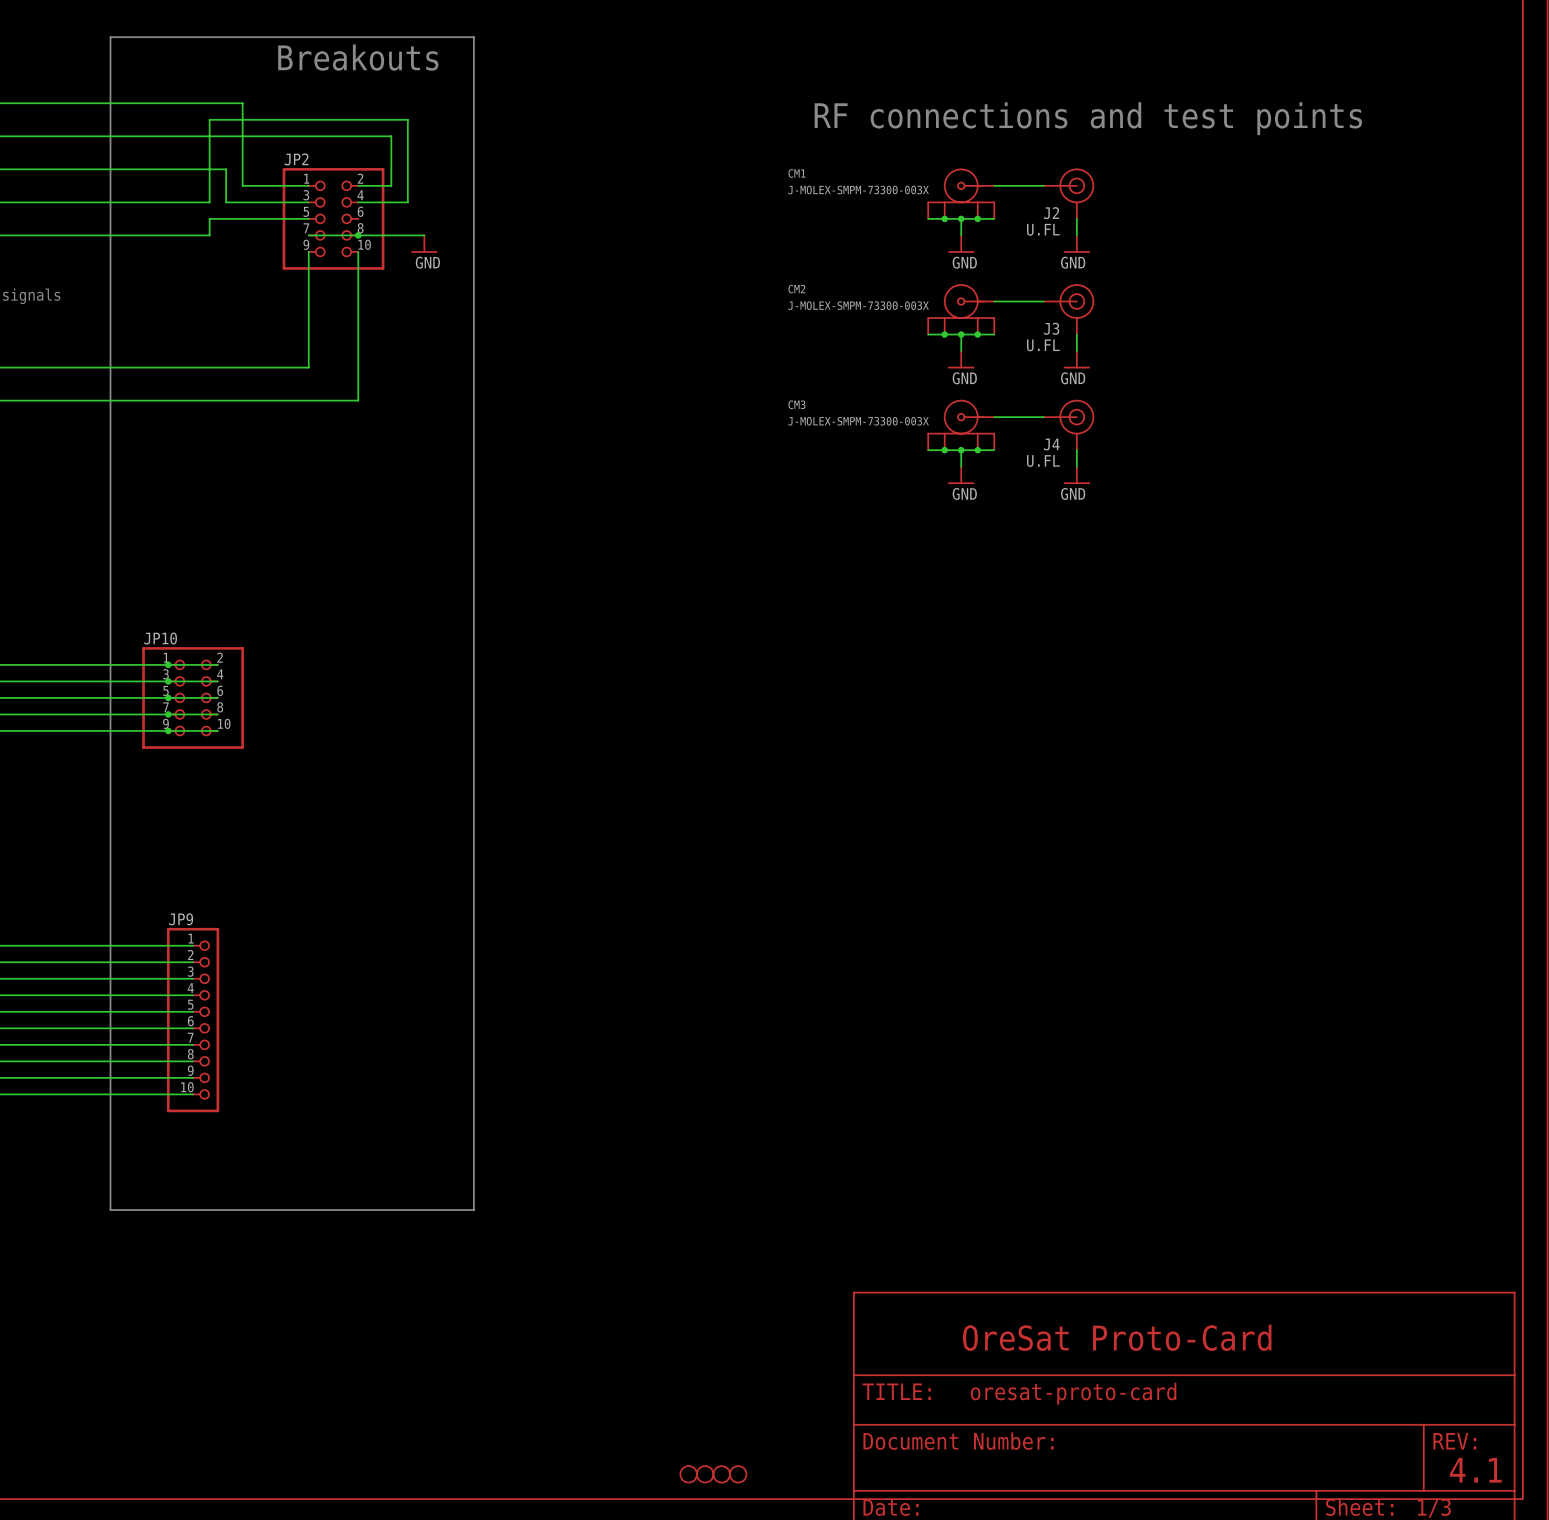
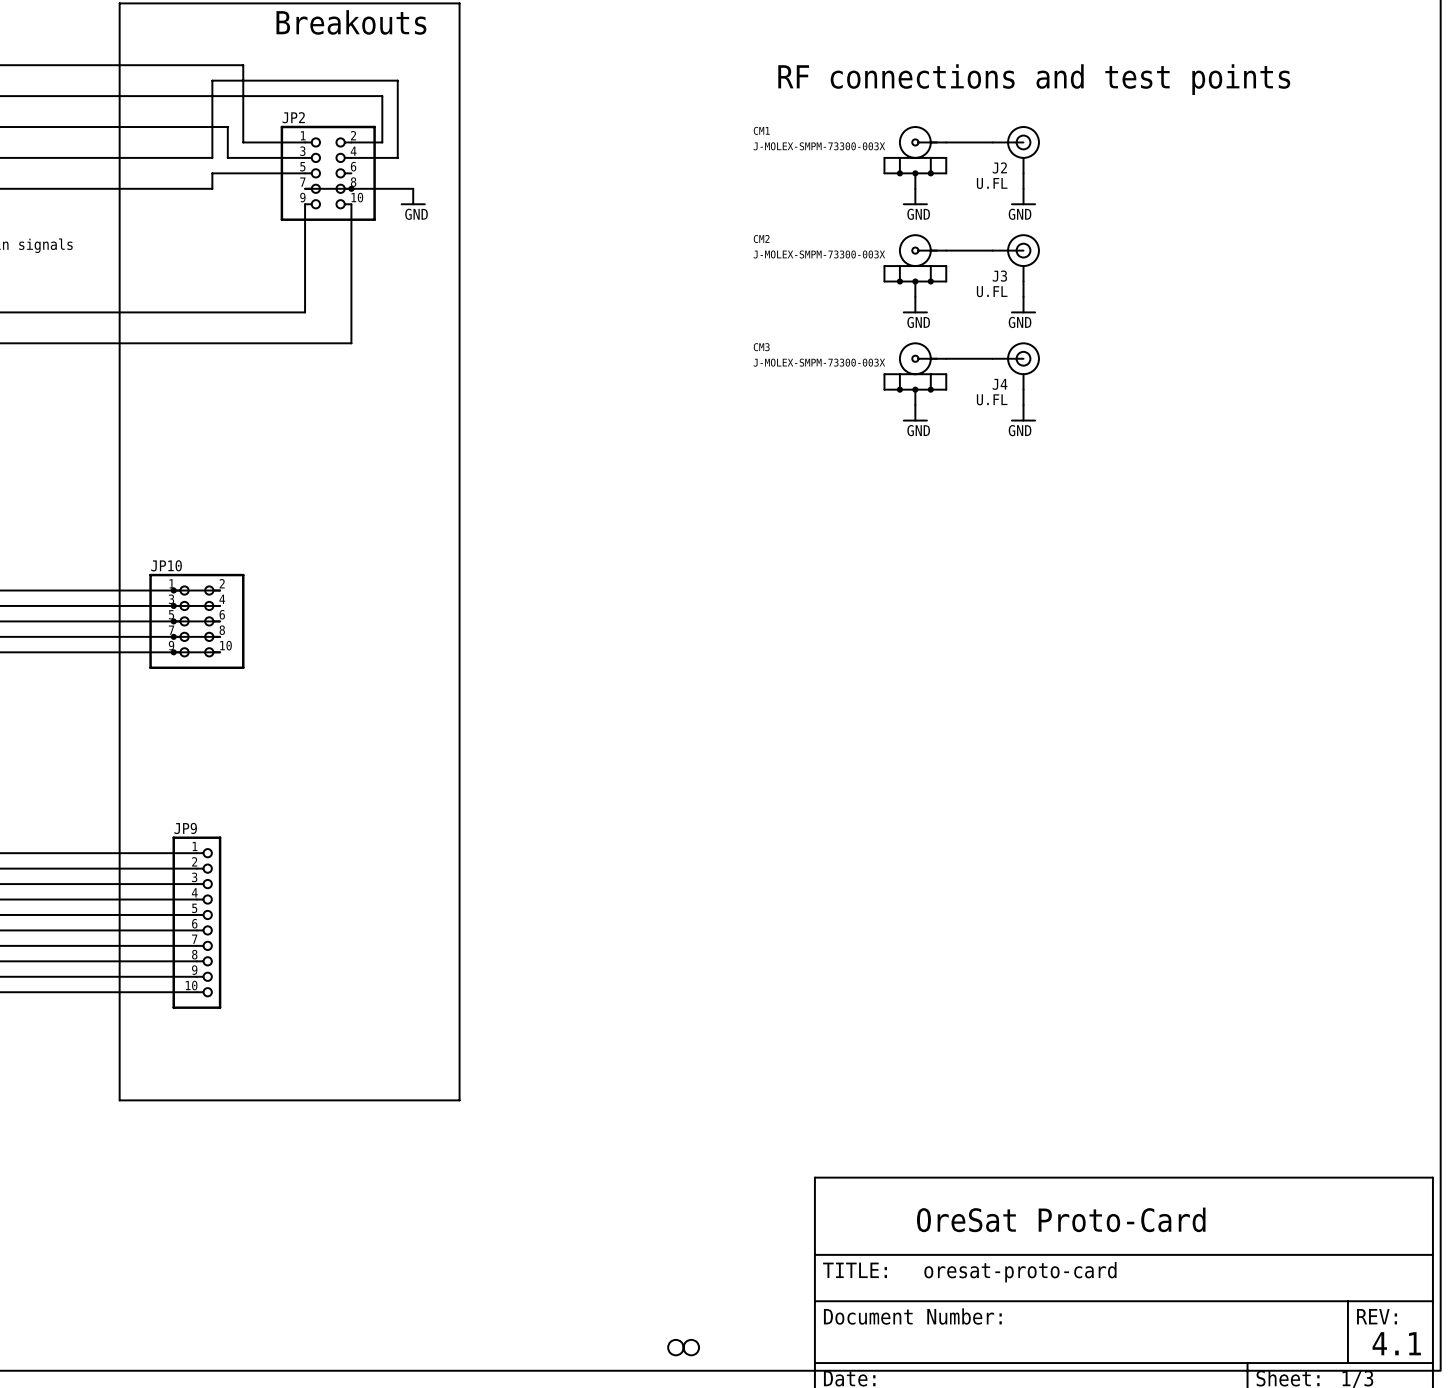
part: (688, 1474) -> none
part: (738, 1474) -> none

